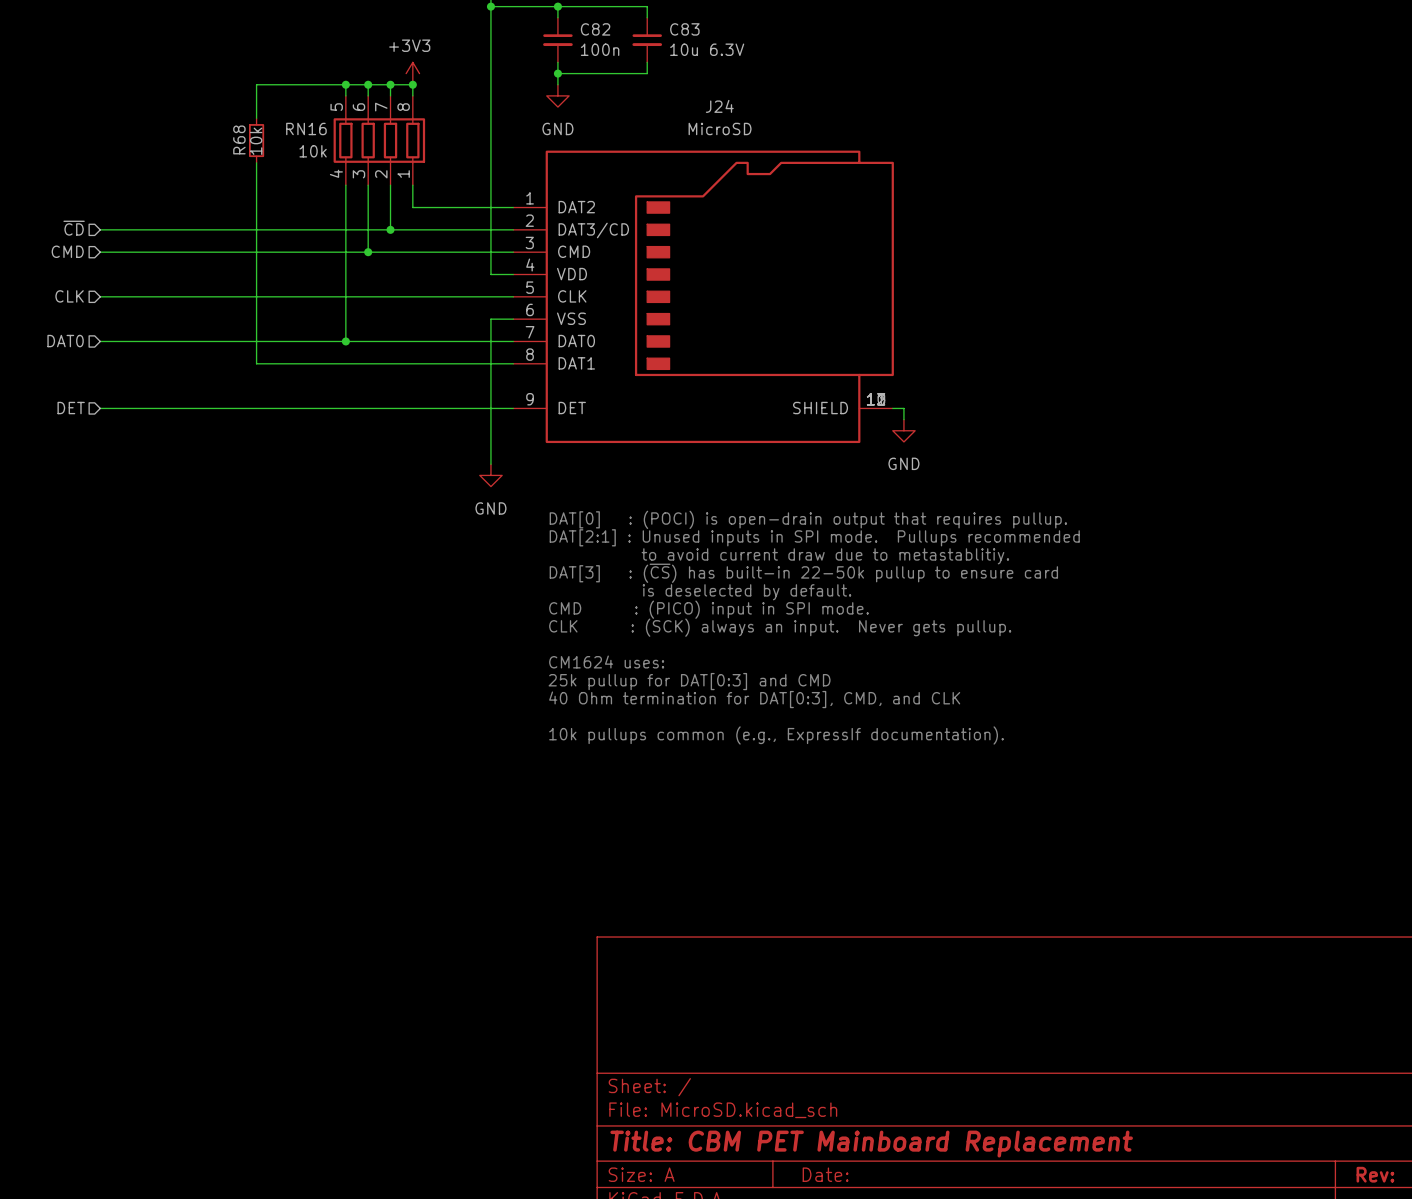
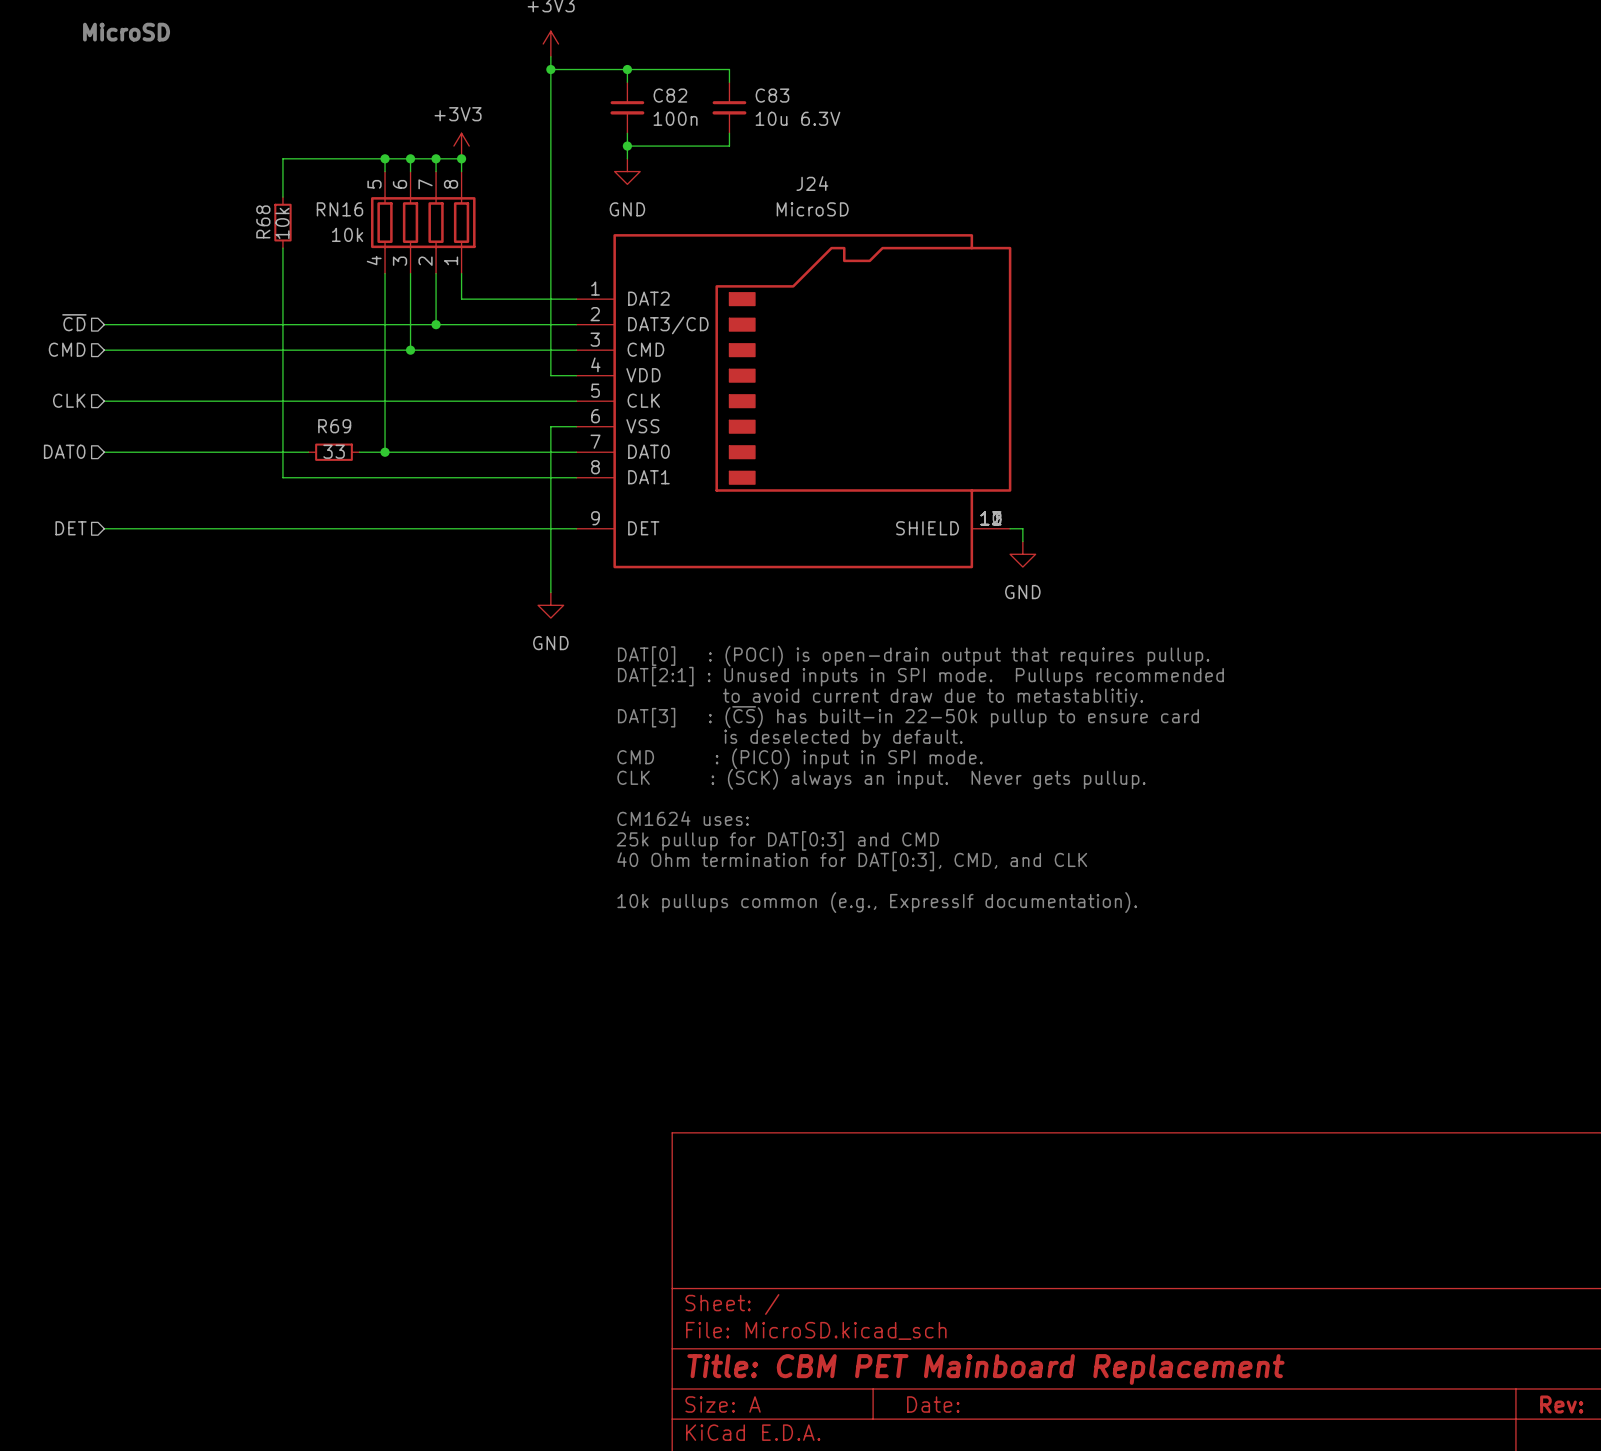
wire: (278, 341) (323, 341) -> none
R69: none -> 33 (333, 452)

